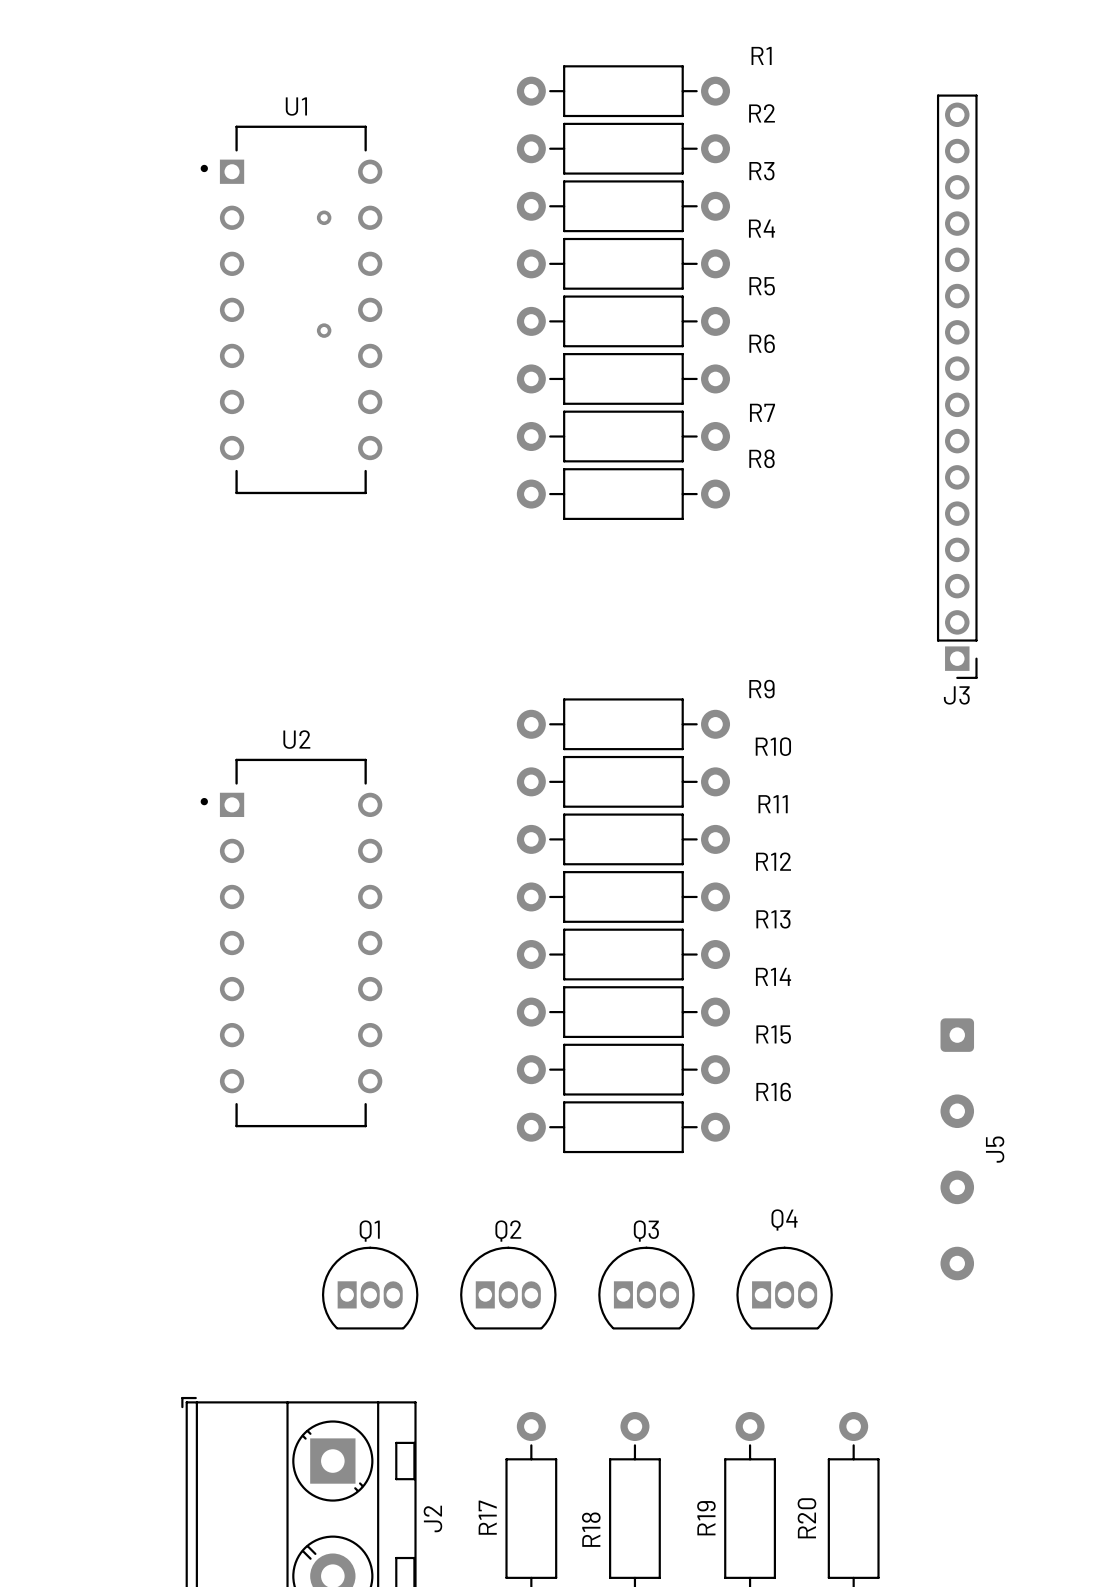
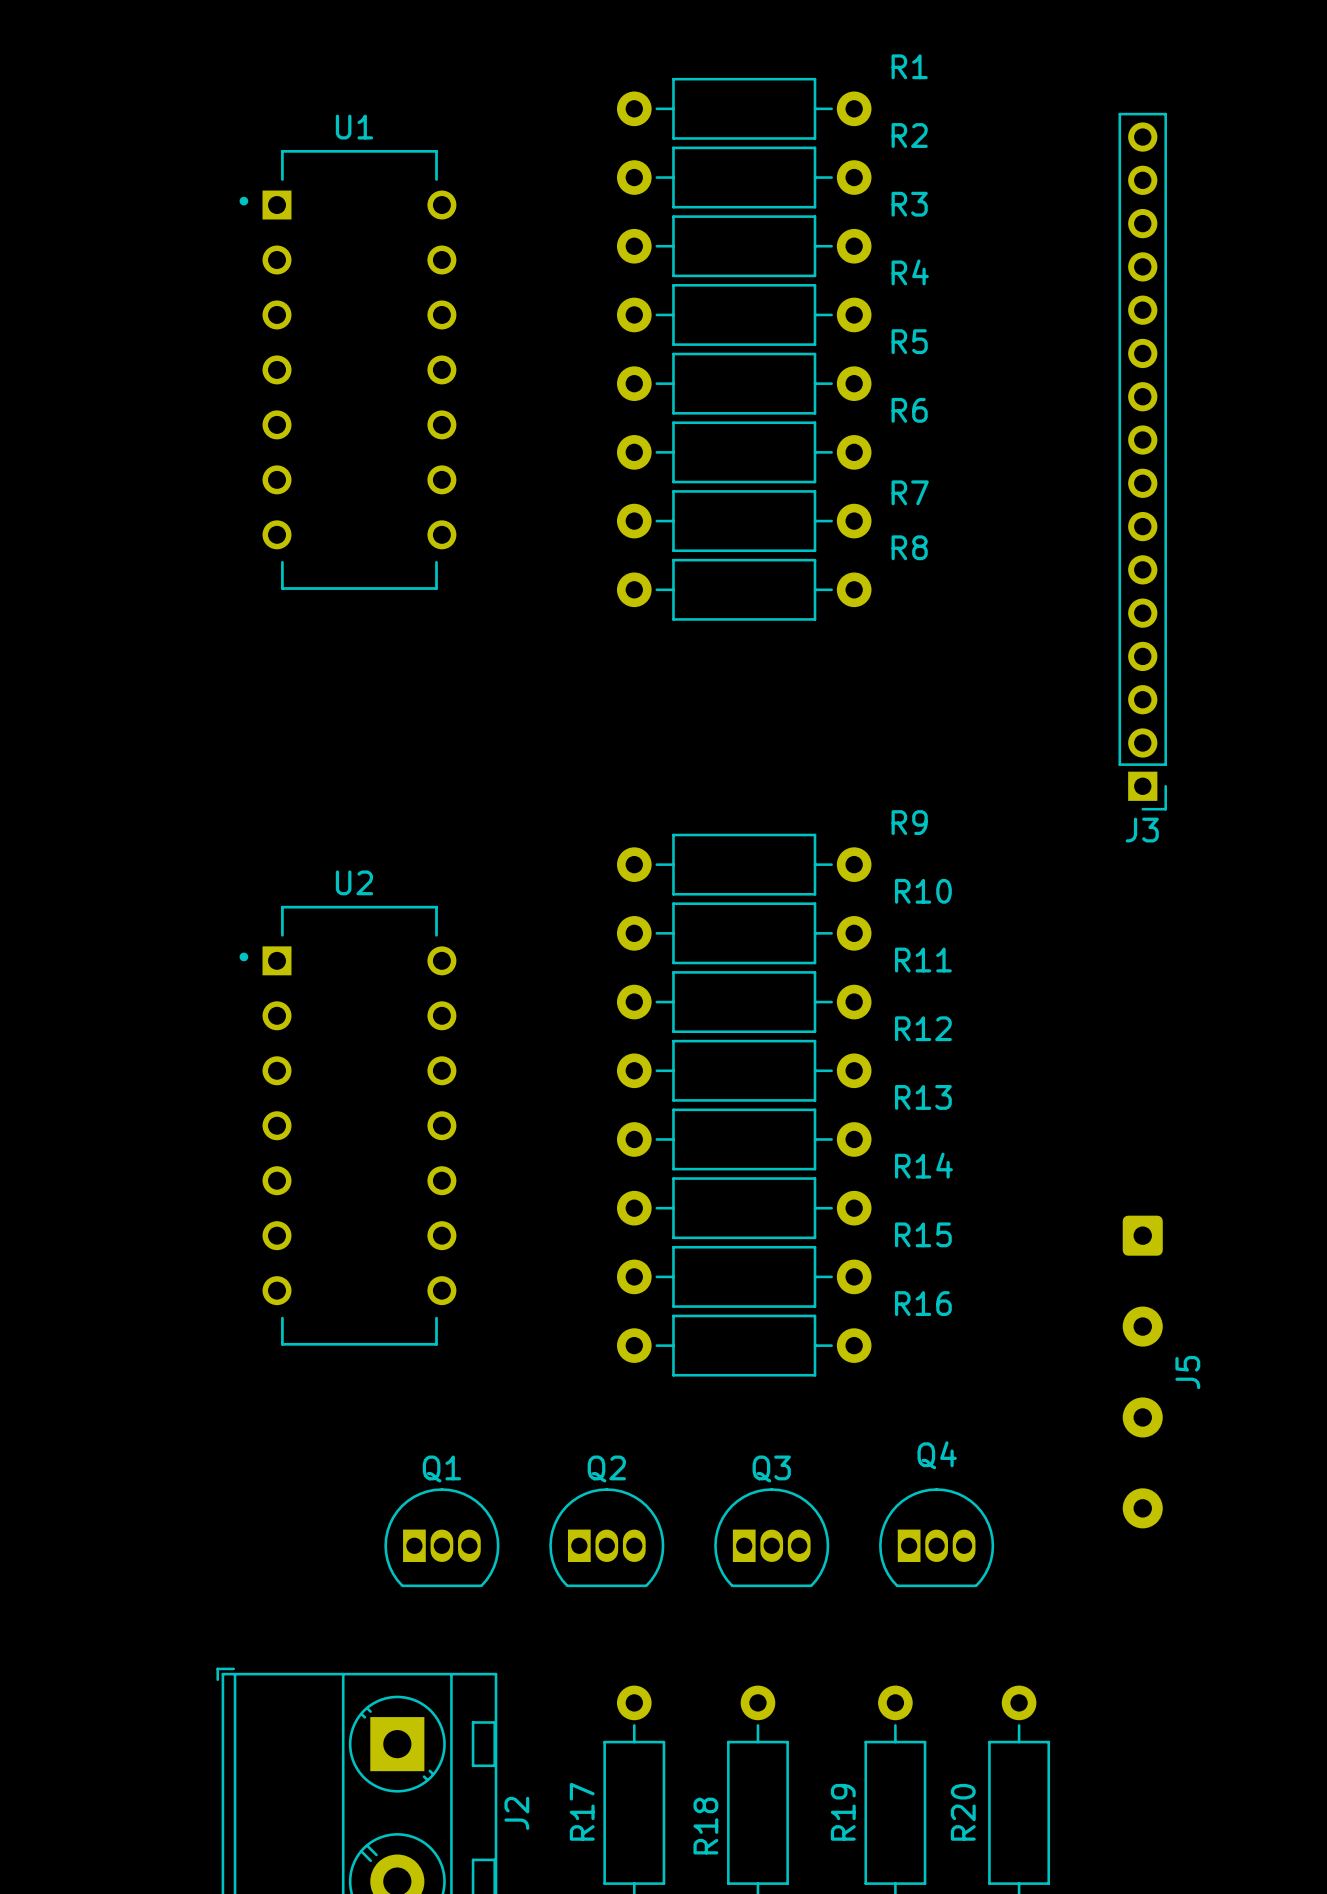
via: (324, 217) -> none
via: (324, 330) -> none

